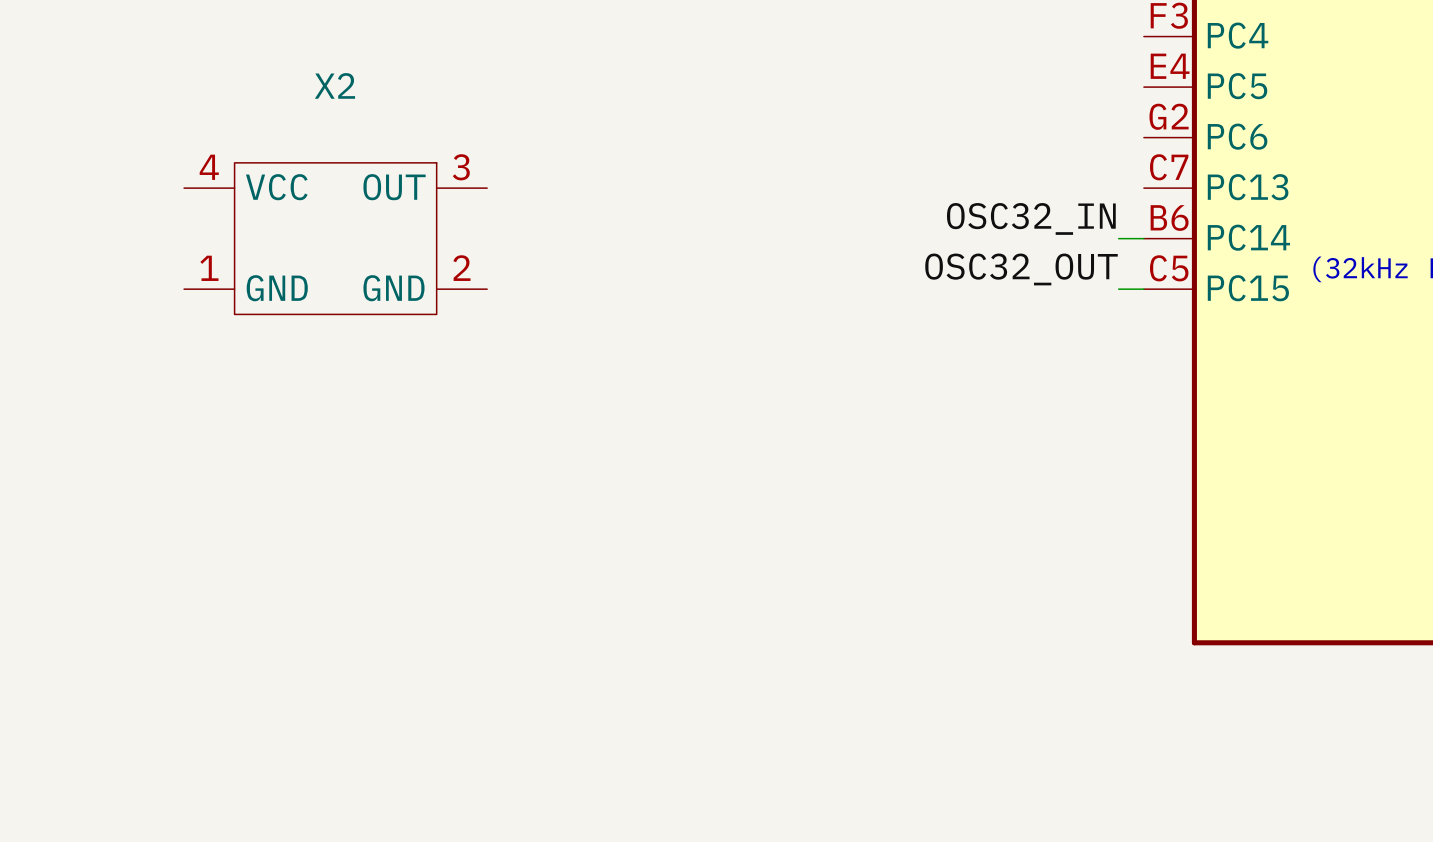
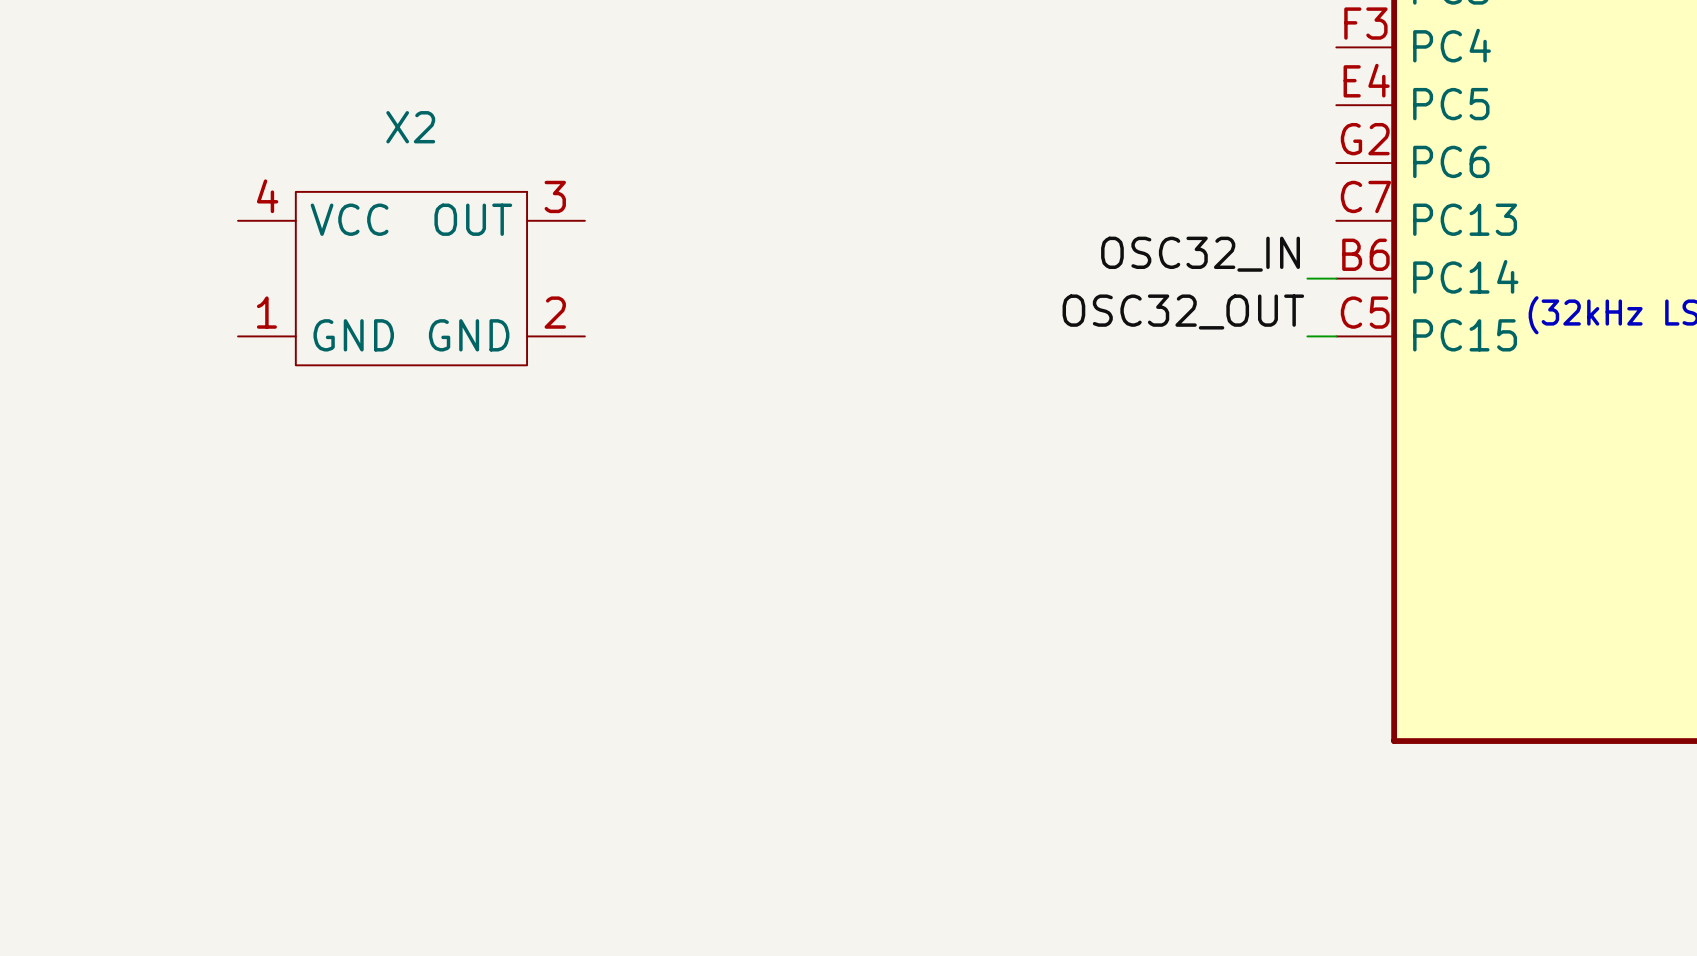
X2 name position: X2 (334, 85) -> X2 (410, 127)

